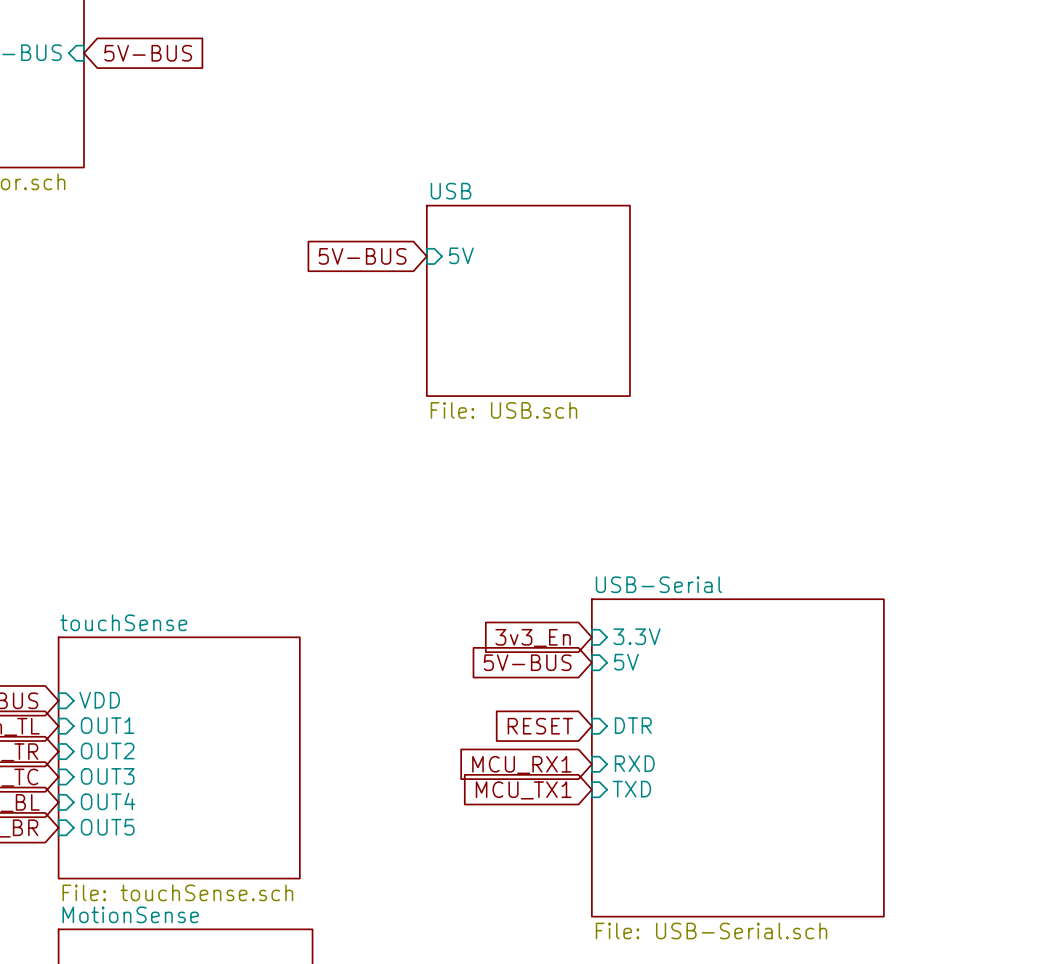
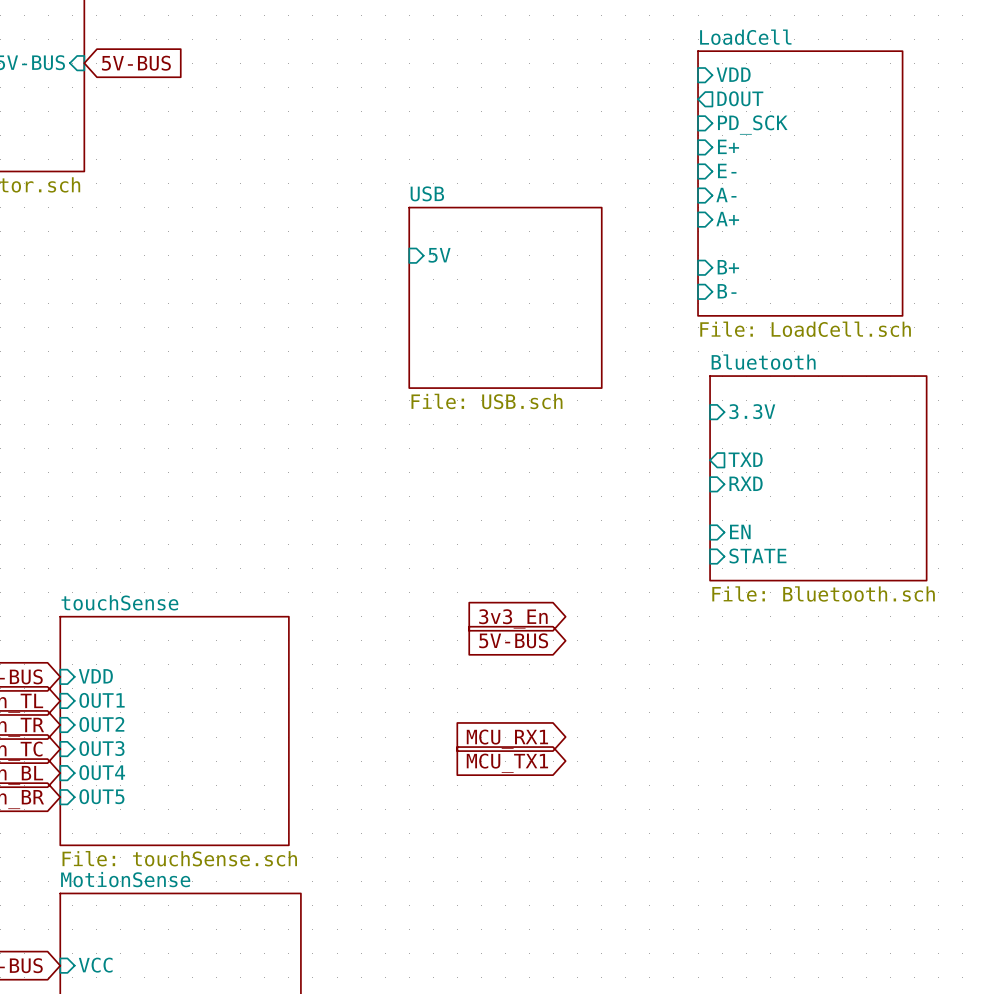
sheet pin: none -> VDD (733, 74)
sheet pin: none -> DOUT (740, 98)
sheet pin: none -> PD_SCK (752, 125)
sheet pin: none -> E+ (728, 146)
sheet pin: none -> E- (727, 170)
sheet LoadCell: none -> File: LoadCell.sch (800, 183)
sheet pin: none -> A- (726, 195)
sheet pin: none -> A+ (727, 219)
global label: 5V-BUS (362, 256) -> none
sheet pin: none -> B+ (728, 267)
sheet pin: none -> B- (727, 291)
sheet pin: none -> 3.3V (752, 411)
sheet pin: none -> TXD (745, 459)
sheet Bluetooth: none -> File: Bluetooth.sch (818, 478)
sheet pin: none -> RXD (746, 483)
sheet pin: none -> EN (740, 531)
sheet pin: none -> STATE (757, 556)
sheet pin: 3.3V (636, 636) -> none
sheet pin: 5V (626, 662) -> none
sheet pin: DTR (633, 725) -> none
global label: RESET (540, 726) -> none
sheet USB-Serial: File: USB-Serial.sch (737, 757) -> none
sheet pin: RXD (634, 763) -> none
sheet pin: TXD (631, 789) -> none

